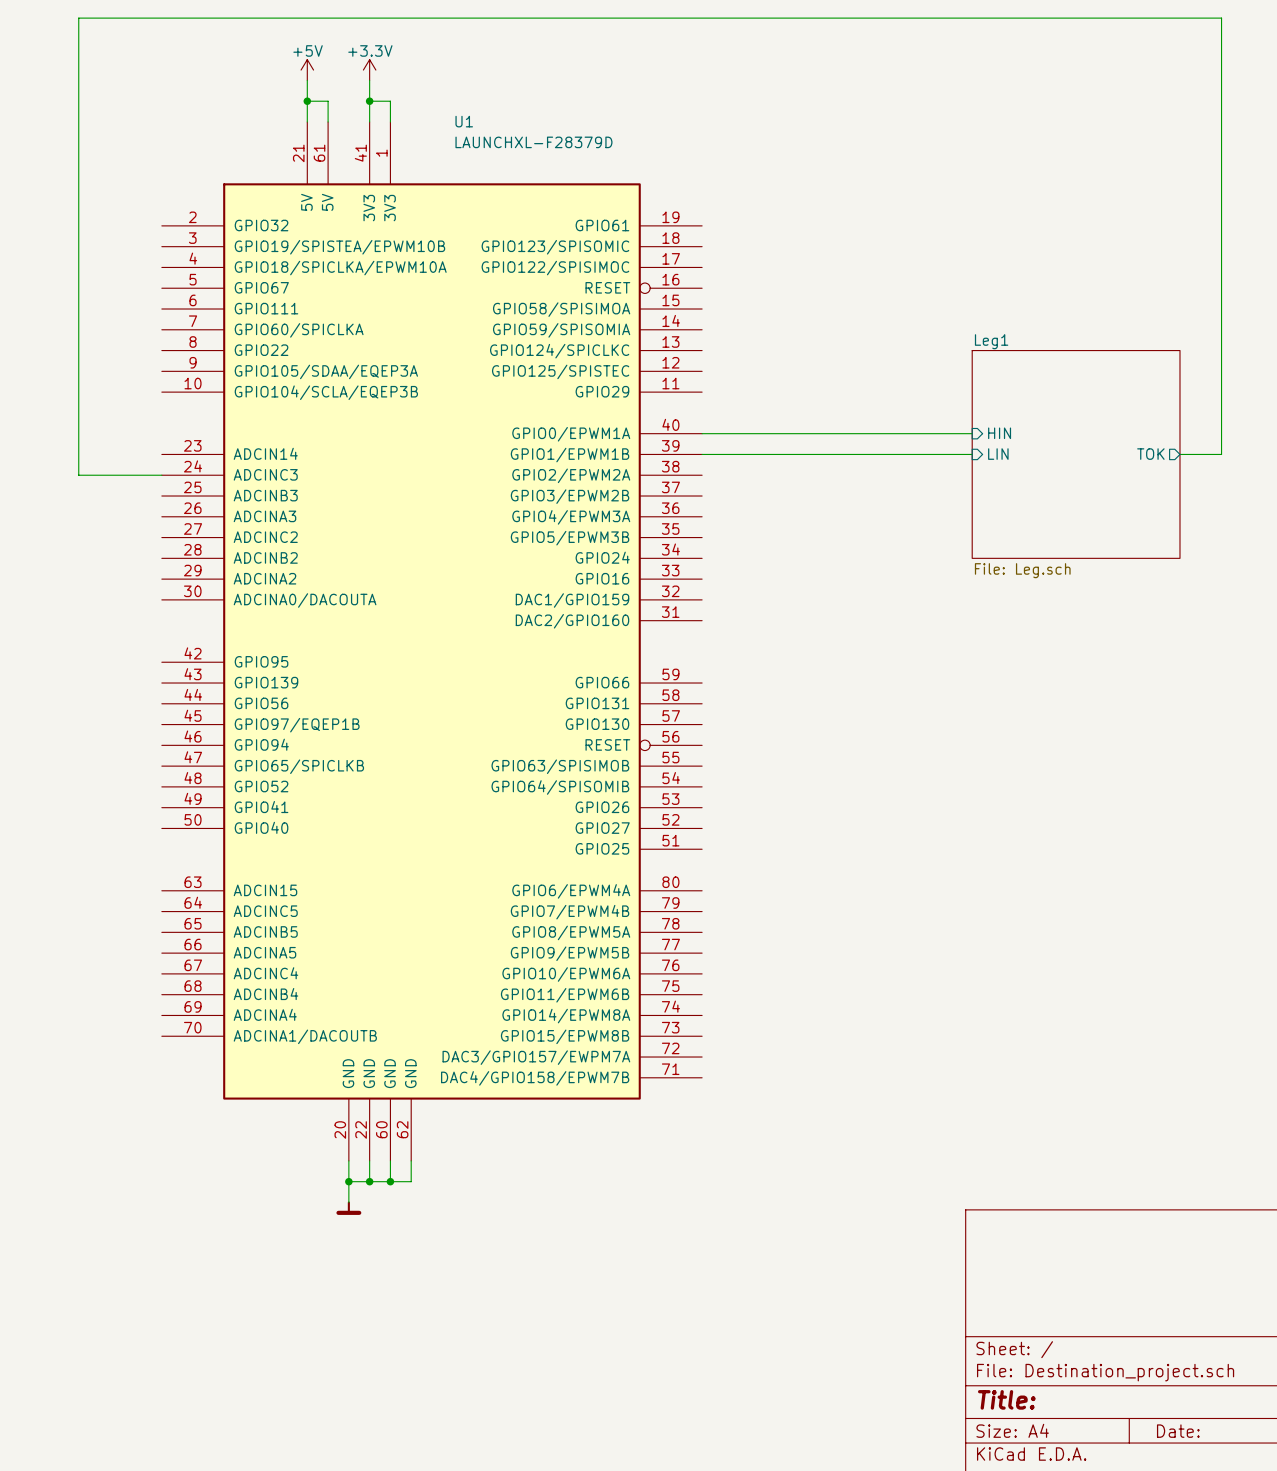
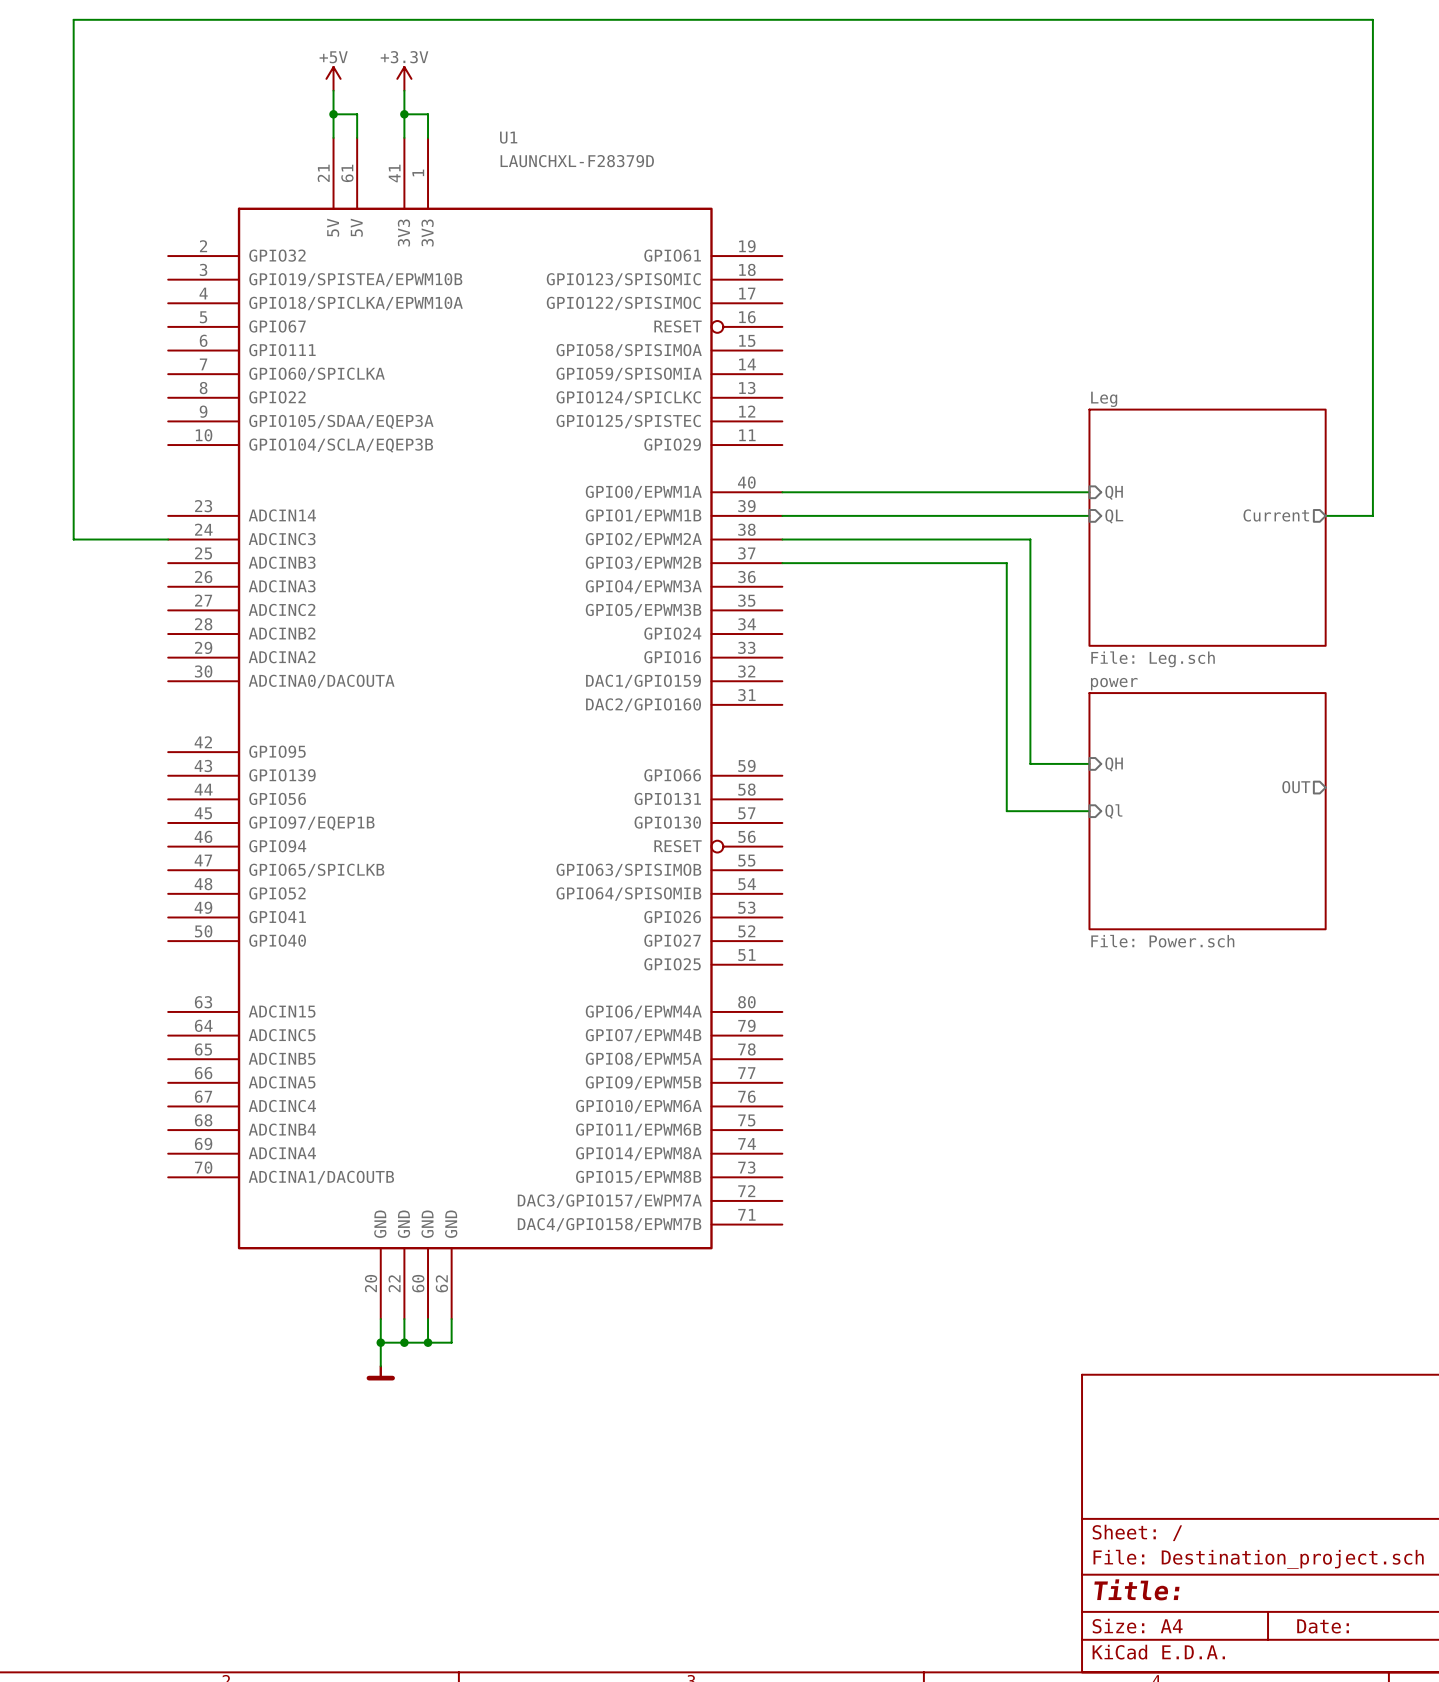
sheet pin: HIN (999, 433) -> QH (1114, 492)
sheet pin: LIN (998, 454) -> QL (1114, 516)
sheet Leg1: File: Leg.sch (1076, 454) -> none
sheet pin: TOK (1150, 454) -> Current (1276, 515)
sheet Leg: none -> File: Leg.sch (1207, 527)
wire: none -> (782, 539) (1030, 539) (1030, 763) (1089, 763)
wire: none -> (782, 563) (1006, 563) (1006, 811) (1089, 811)
sheet pin: none -> QH (1114, 764)
sheet pin: none -> OUT (1296, 787)
sheet pin: none -> Ql (1113, 811)
sheet power: none -> File: Power.sch (1207, 811)

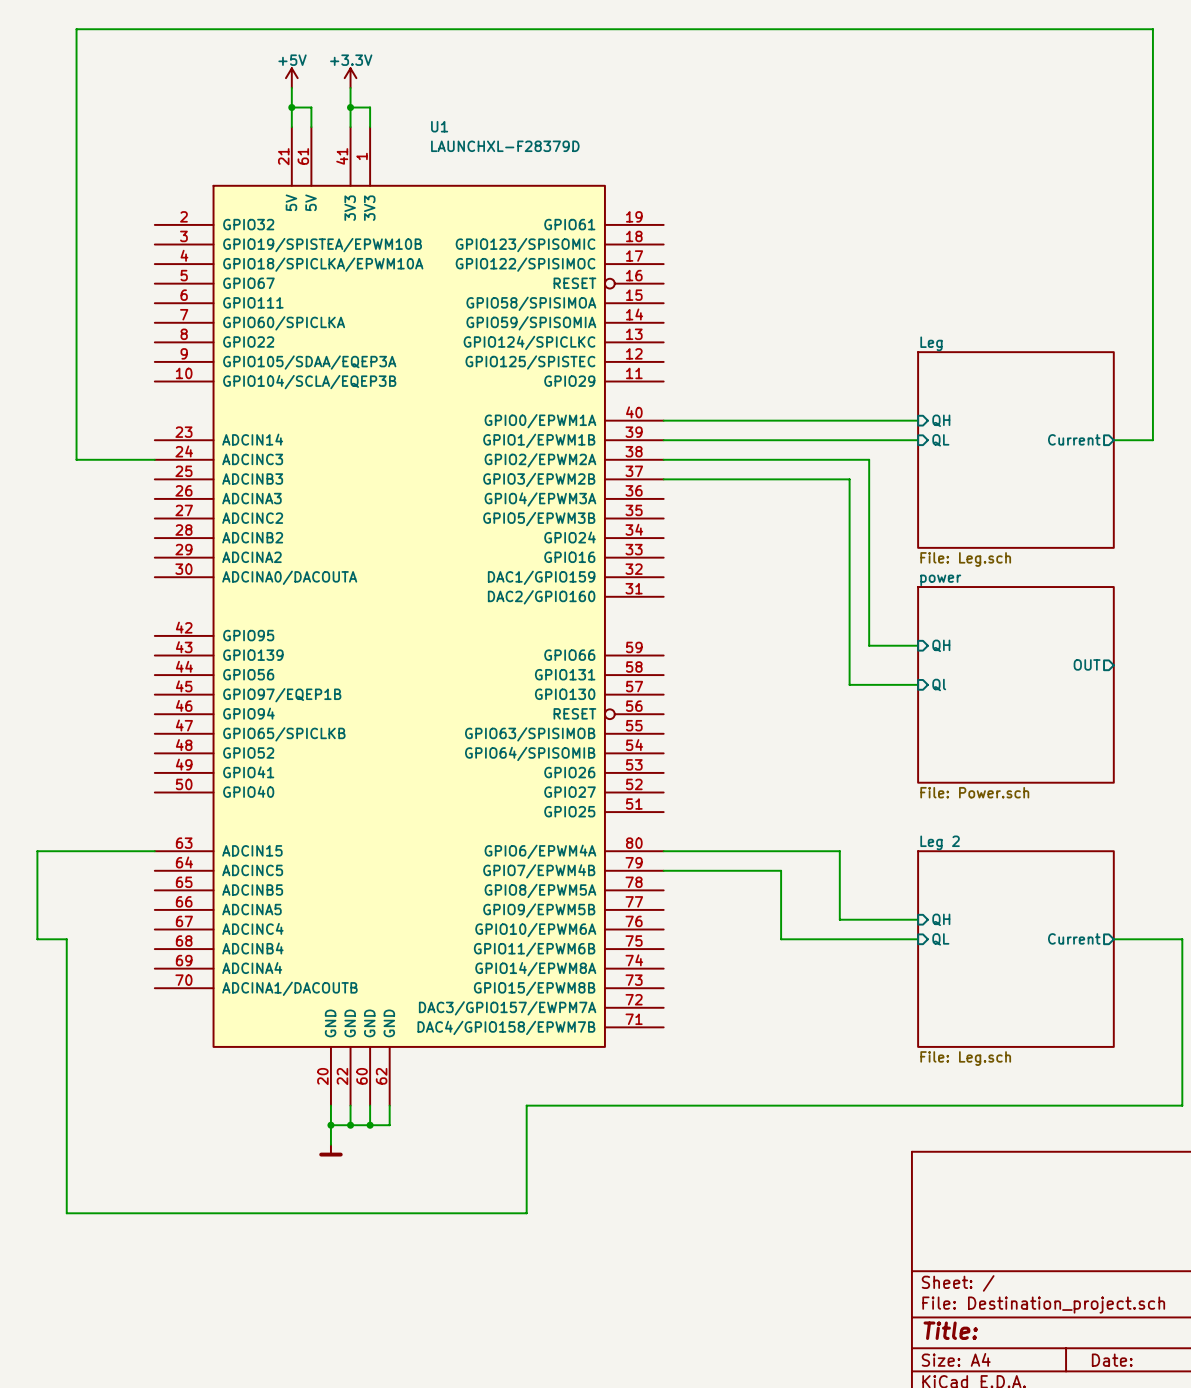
wire: none -> (154, 851) (37, 851) (37, 939) (66, 939) (66, 1213) (526, 1213) (526, 1105) (1182, 1105) (1182, 939) (1113, 939)
wire: none -> (663, 851) (839, 851) (839, 919) (918, 919)
wire: none -> (663, 870) (781, 870) (781, 939) (918, 939)
sheet pin: none -> QH (941, 919)
sheet pin: none -> Current (1074, 938)
sheet pin: none -> QL (940, 939)
sheet Leg 2: none -> File: Leg.sch (1015, 949)

